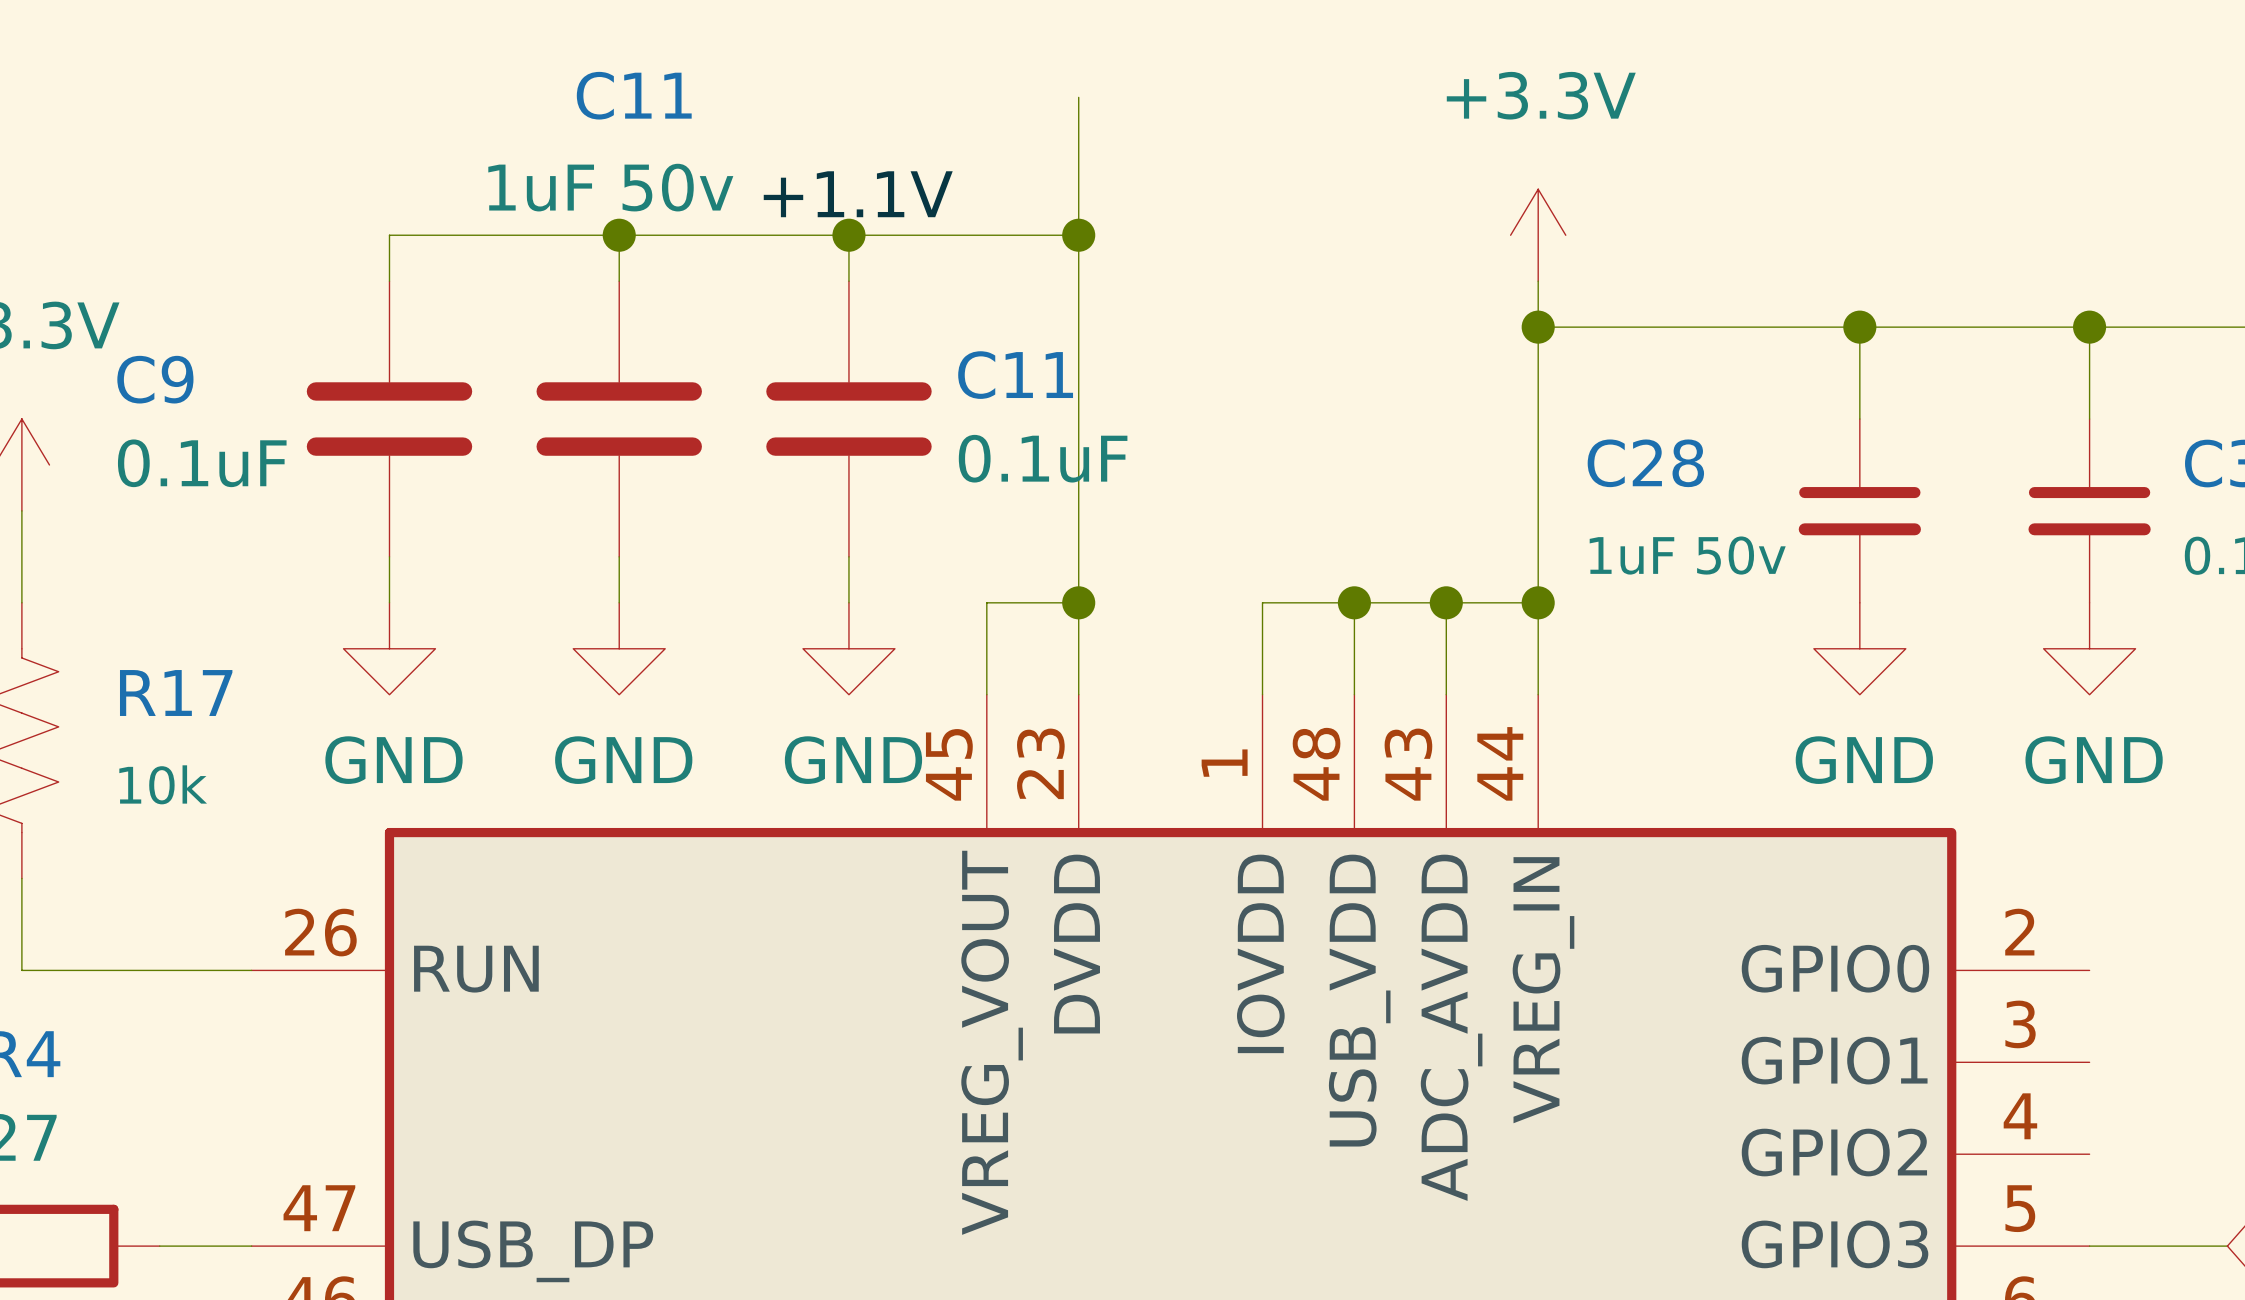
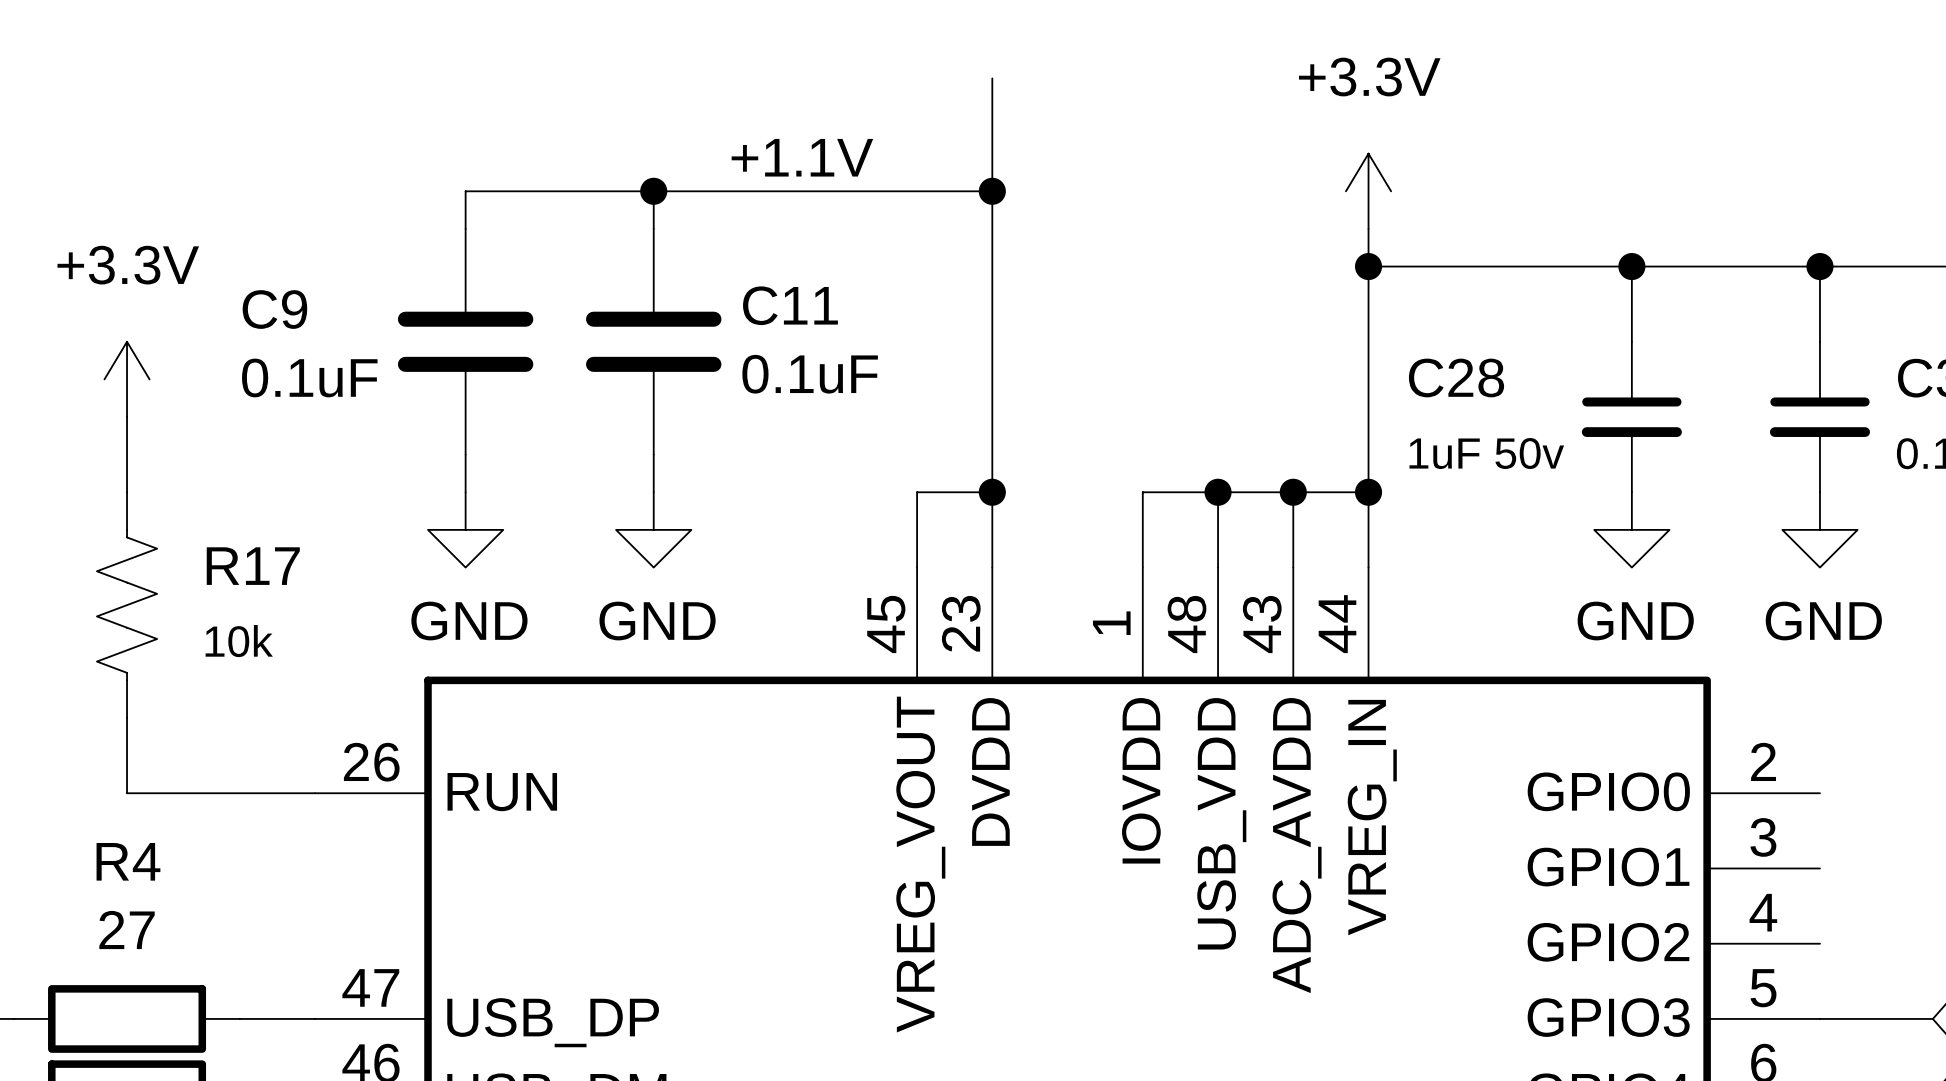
wire: (435, 235) (389, 235) (389, 281) -> (465, 191) (465, 228)
wire: (619, 235) (619, 281) -> none
junction position: (619, 235) -> (653, 191)
wire: (848, 235) (848, 281) -> (653, 191) (653, 228)
junction: (848, 235) -> none
C9 position: (389, 419) -> (465, 341)
C11: 1uF 50v (619, 419) -> none
C11 position: (848, 419) -> (653, 341)
wire: (389, 556) (389, 602) -> none
wire: (619, 556) (619, 602) -> (465, 454) (465, 492)
wire: (848, 556) (848, 602) -> (653, 454) (653, 492)
power symbol position: GND (389, 648) -> GND (465, 529)
power symbol position: GND (619, 648) -> GND (653, 529)
power symbol: GND (848, 648) -> none

